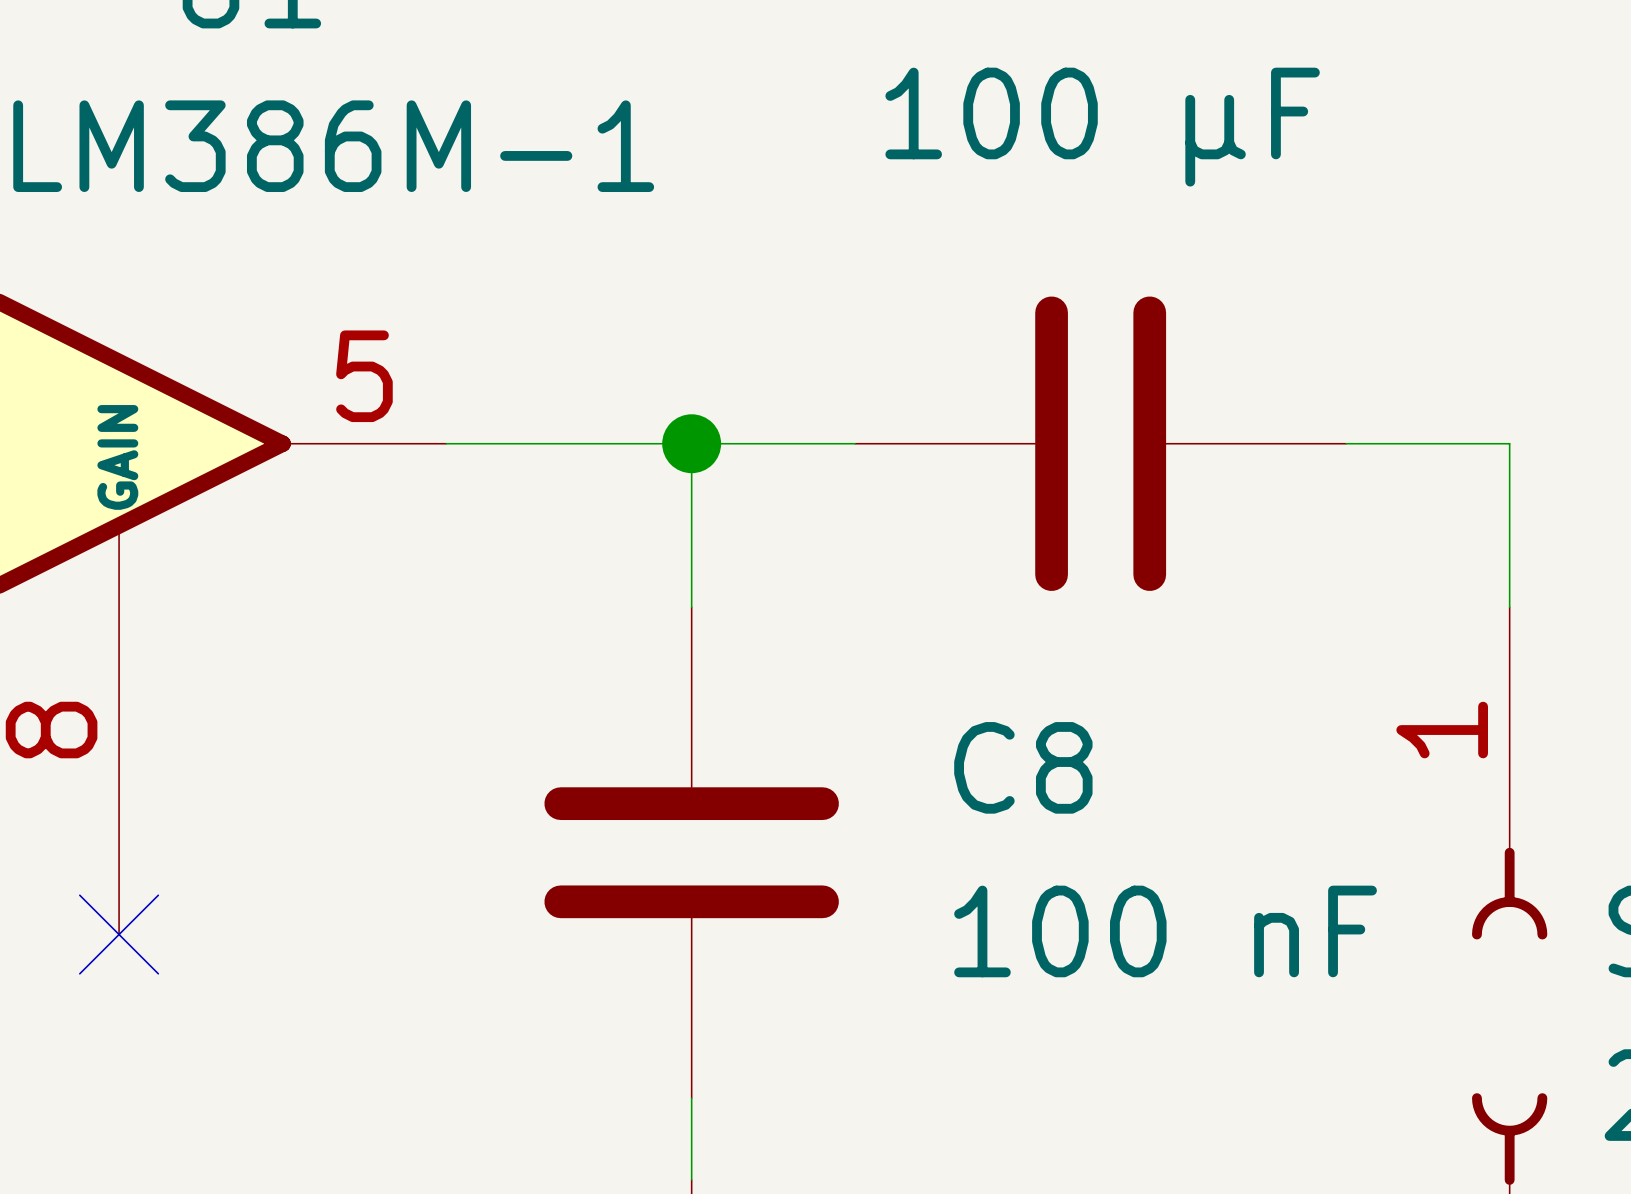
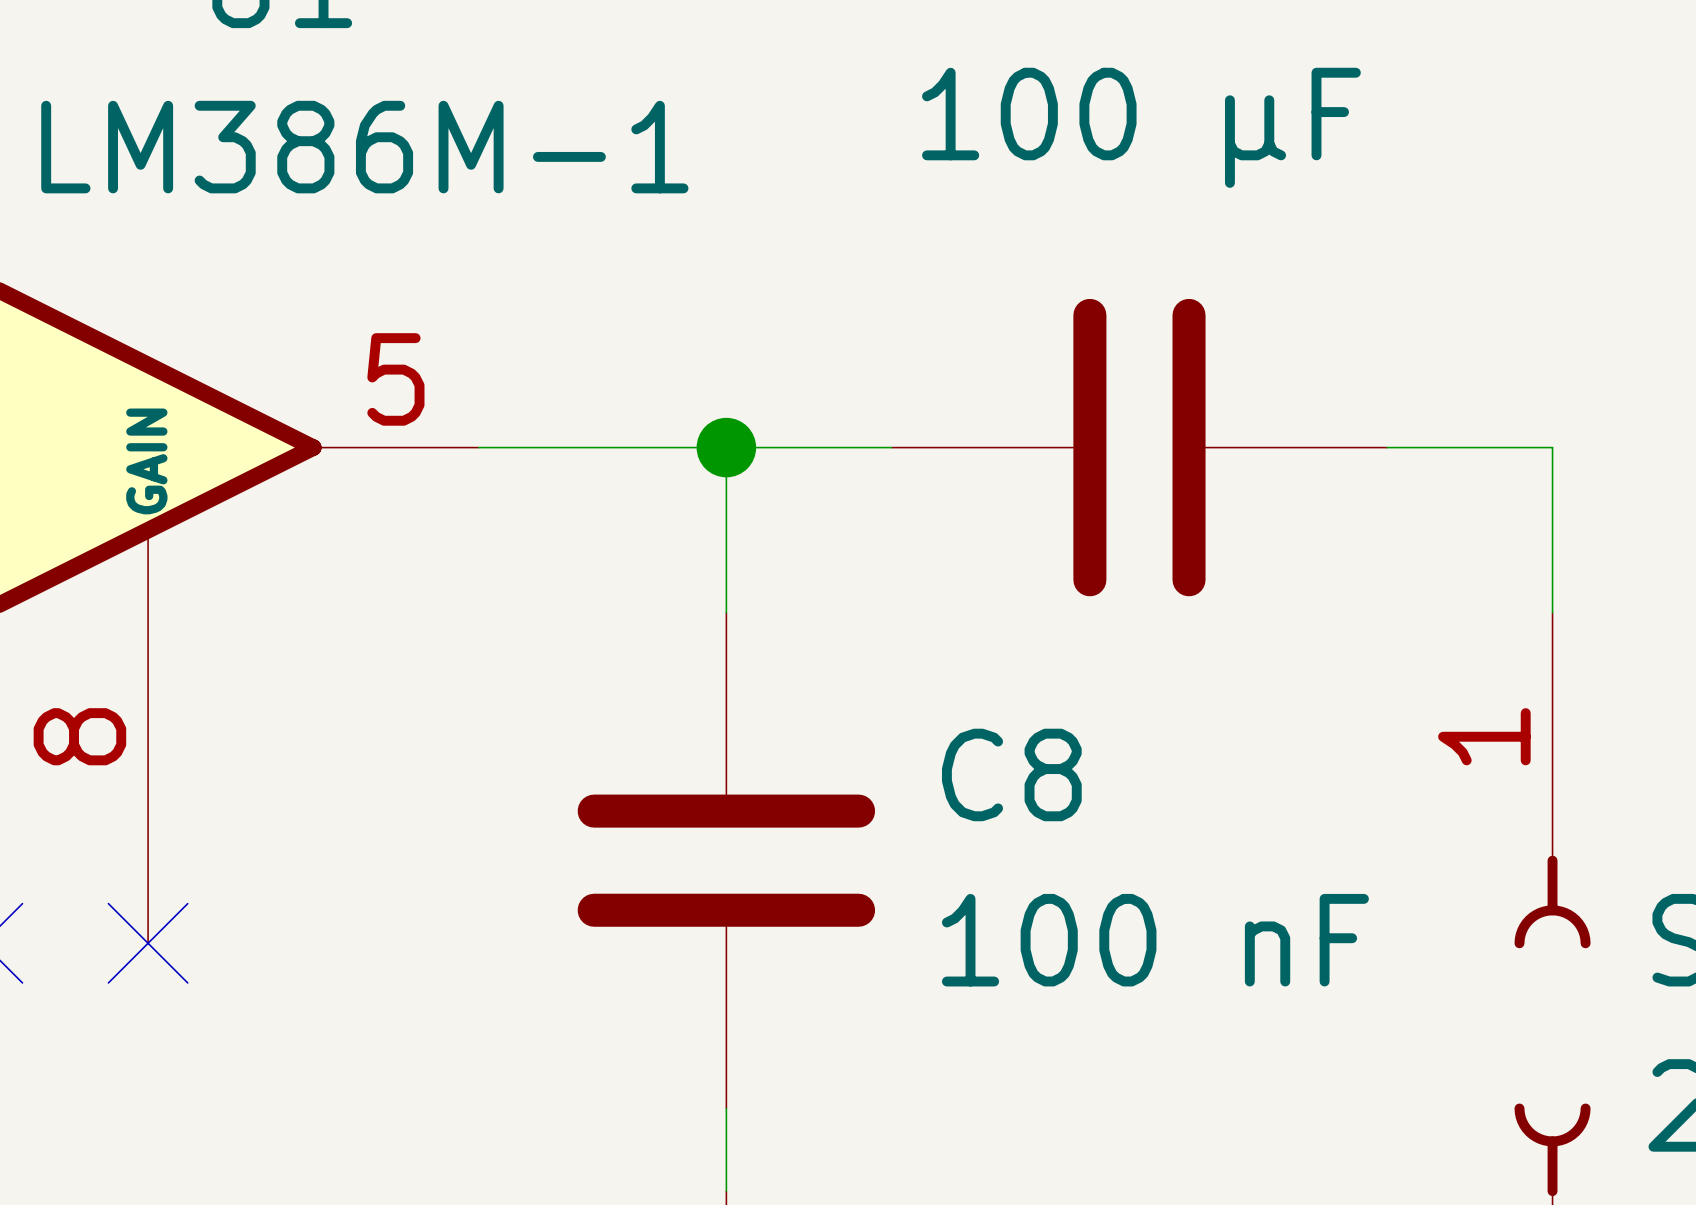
C8 name position: C8 (1023, 767) -> C8 (1011, 774)
C8 value position: 100 nF (1165, 931) -> 100 nF (1155, 940)

